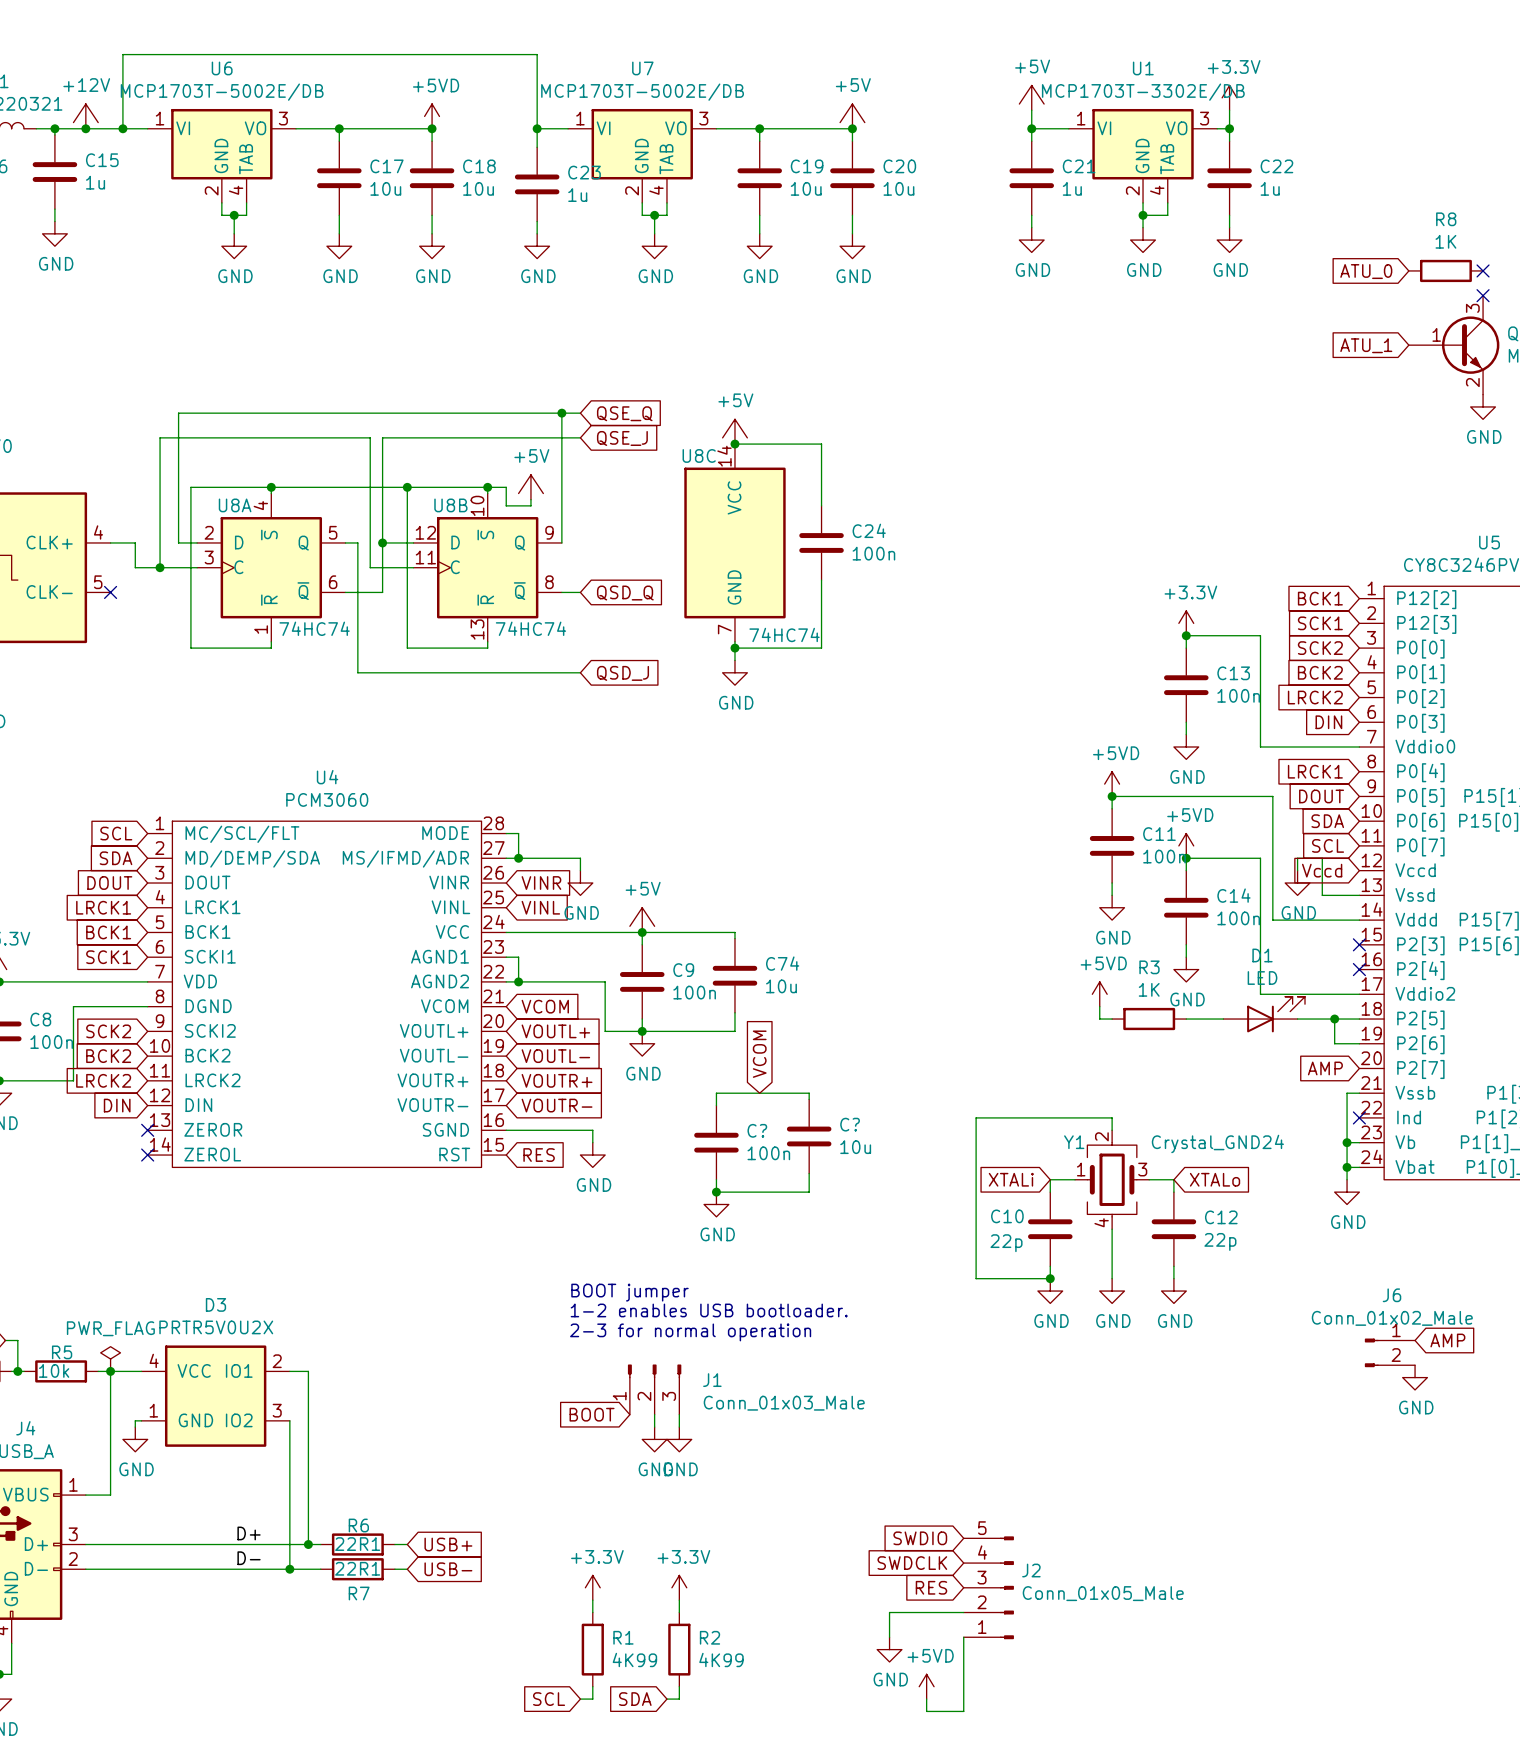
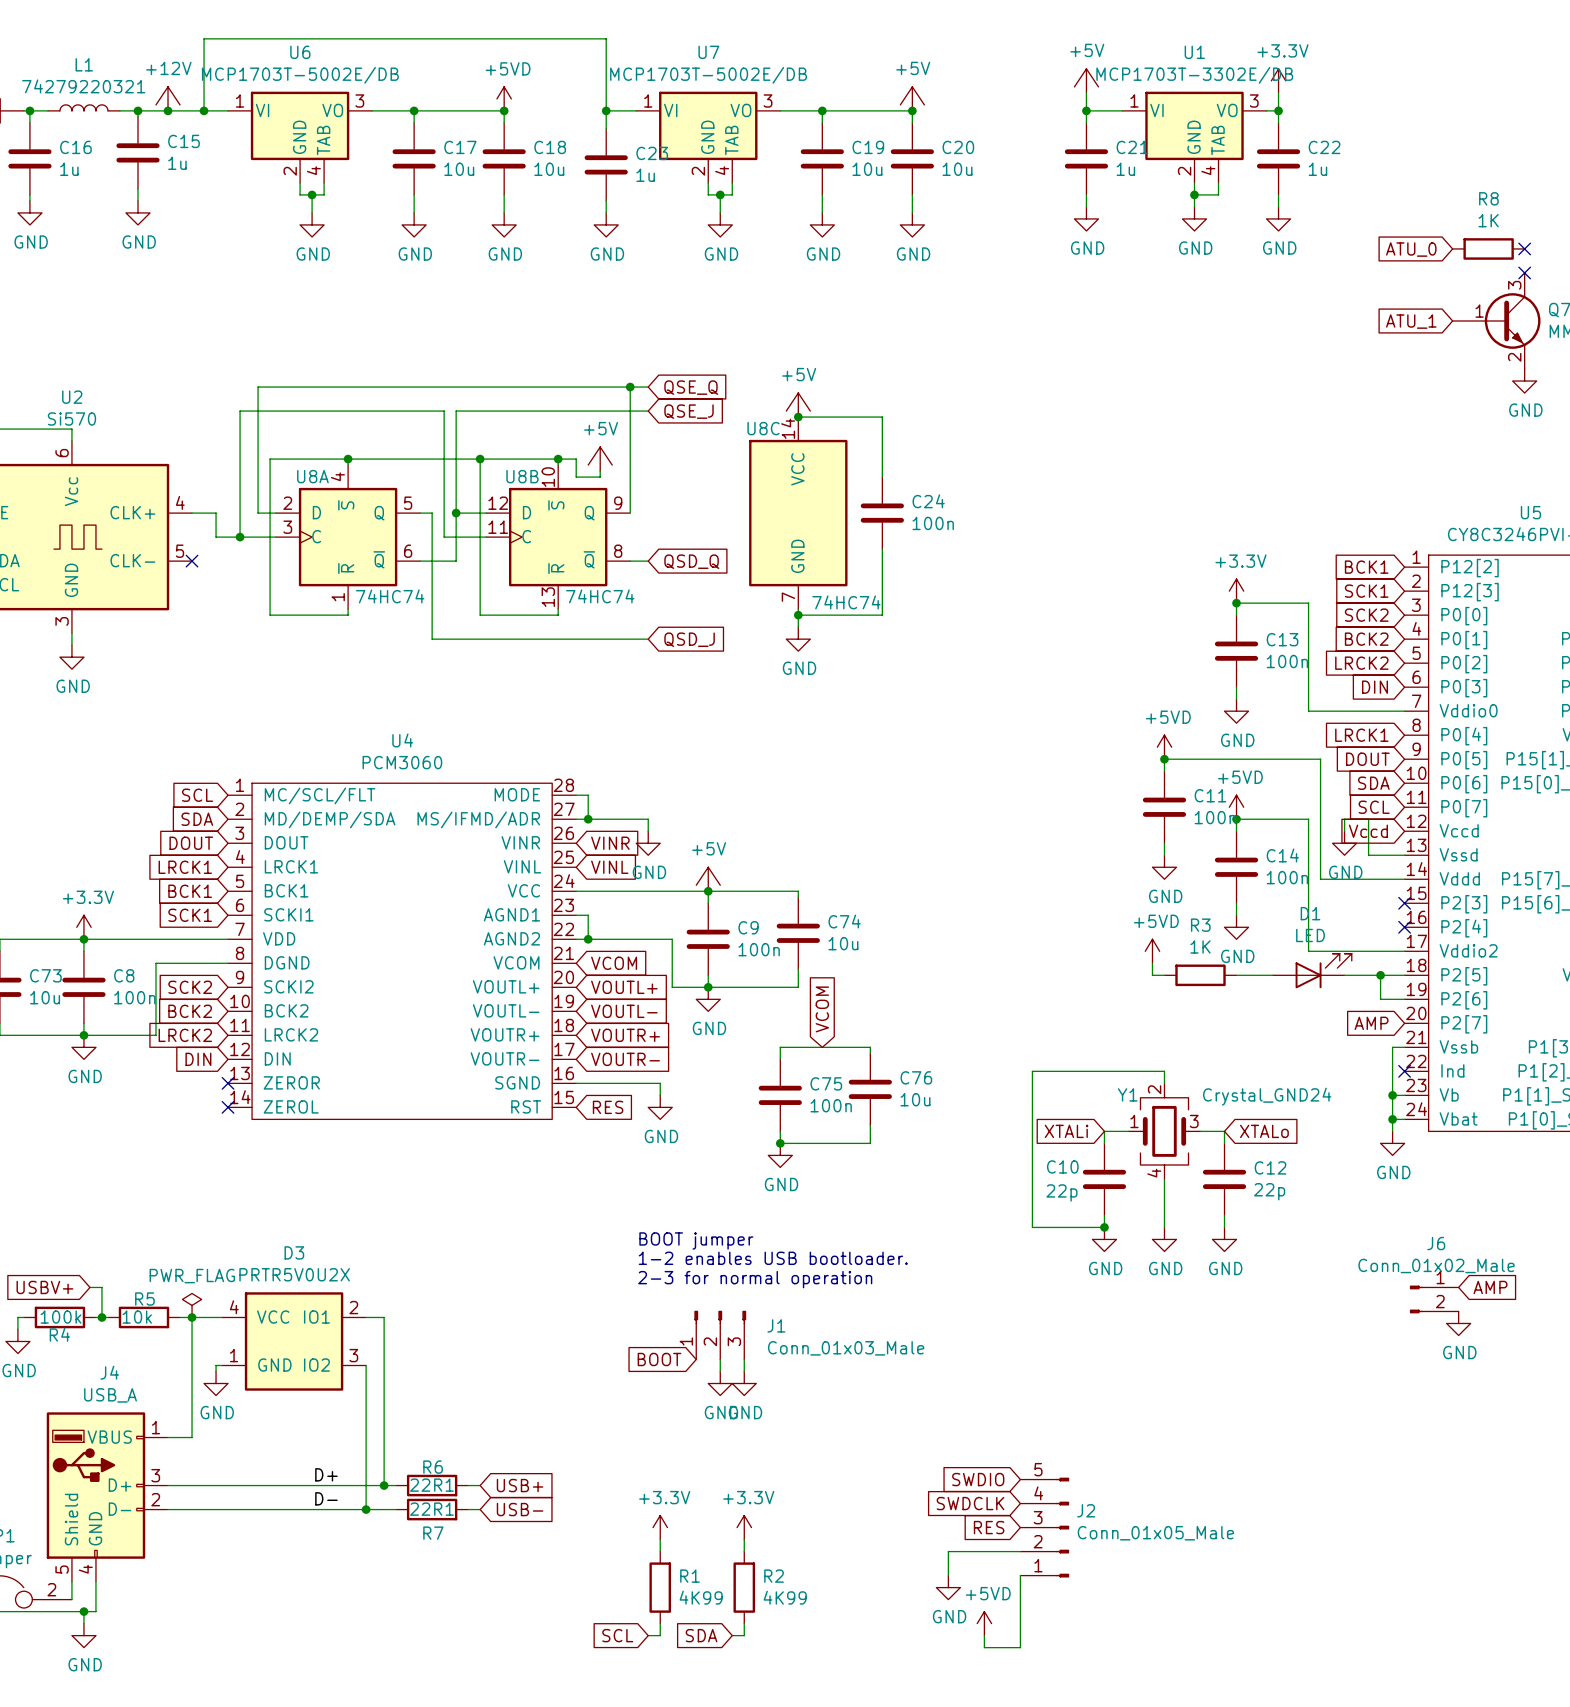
C? name: C? (850, 1124) -> C76 (916, 1077)
C? name: C? (757, 1130) -> C75 (826, 1083)

